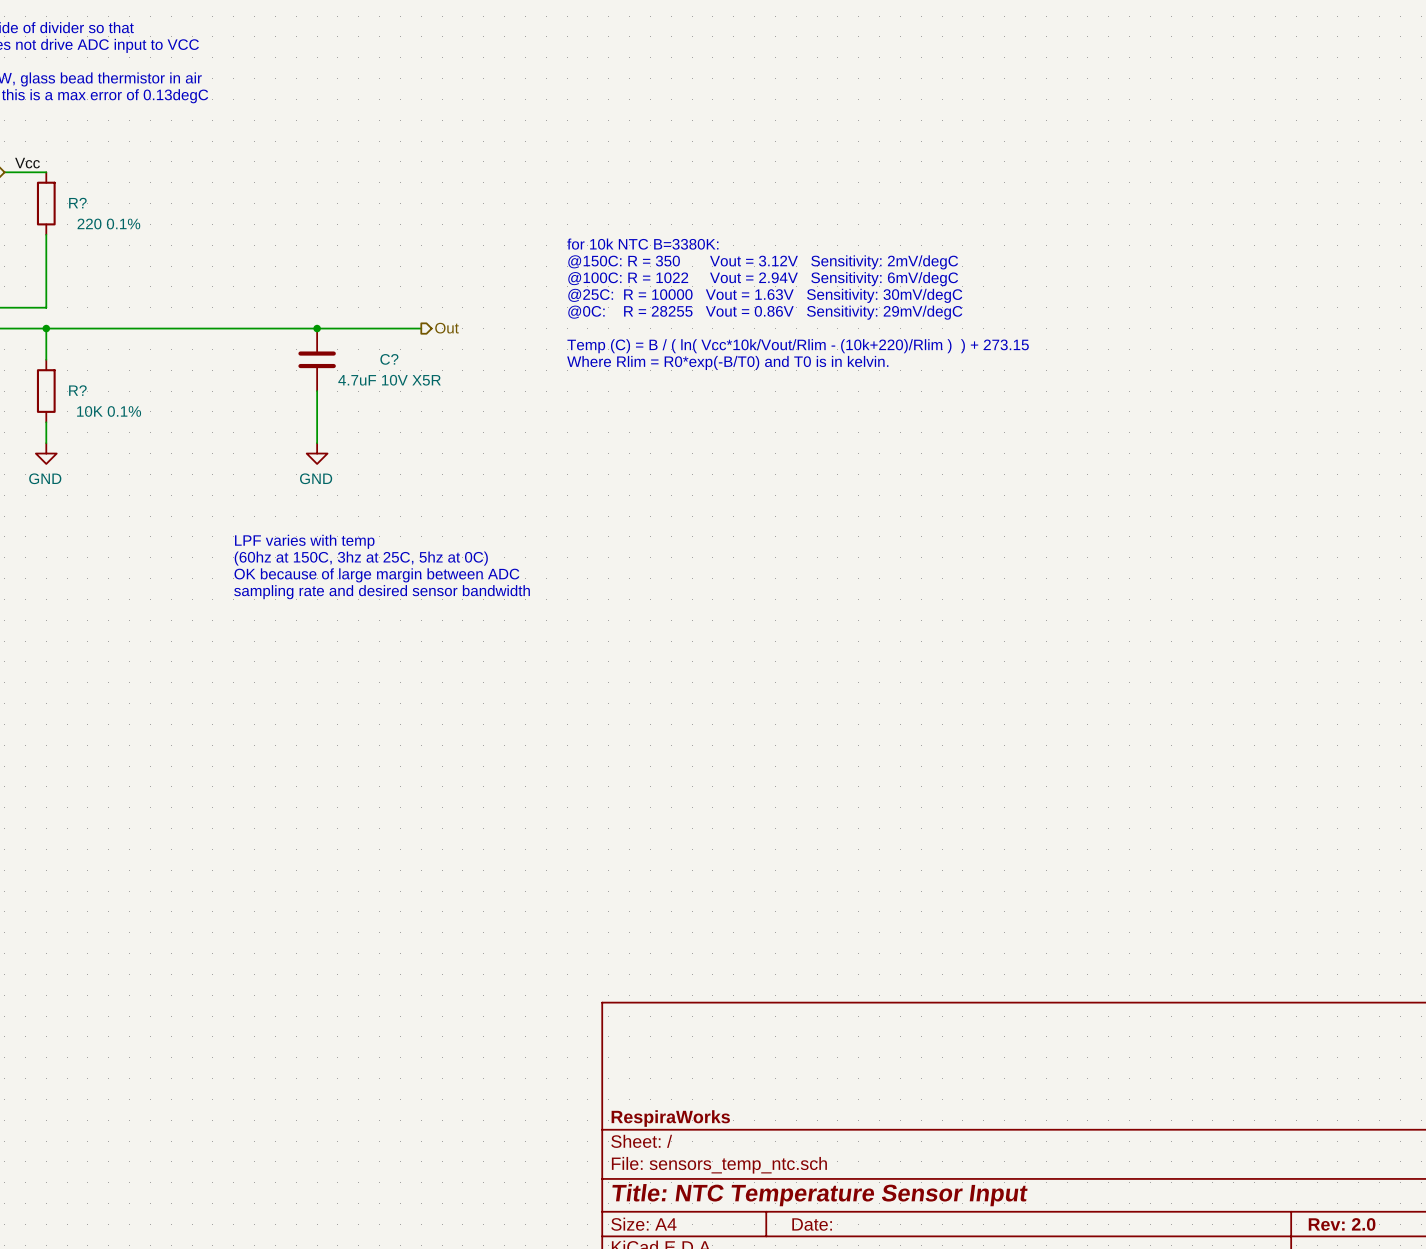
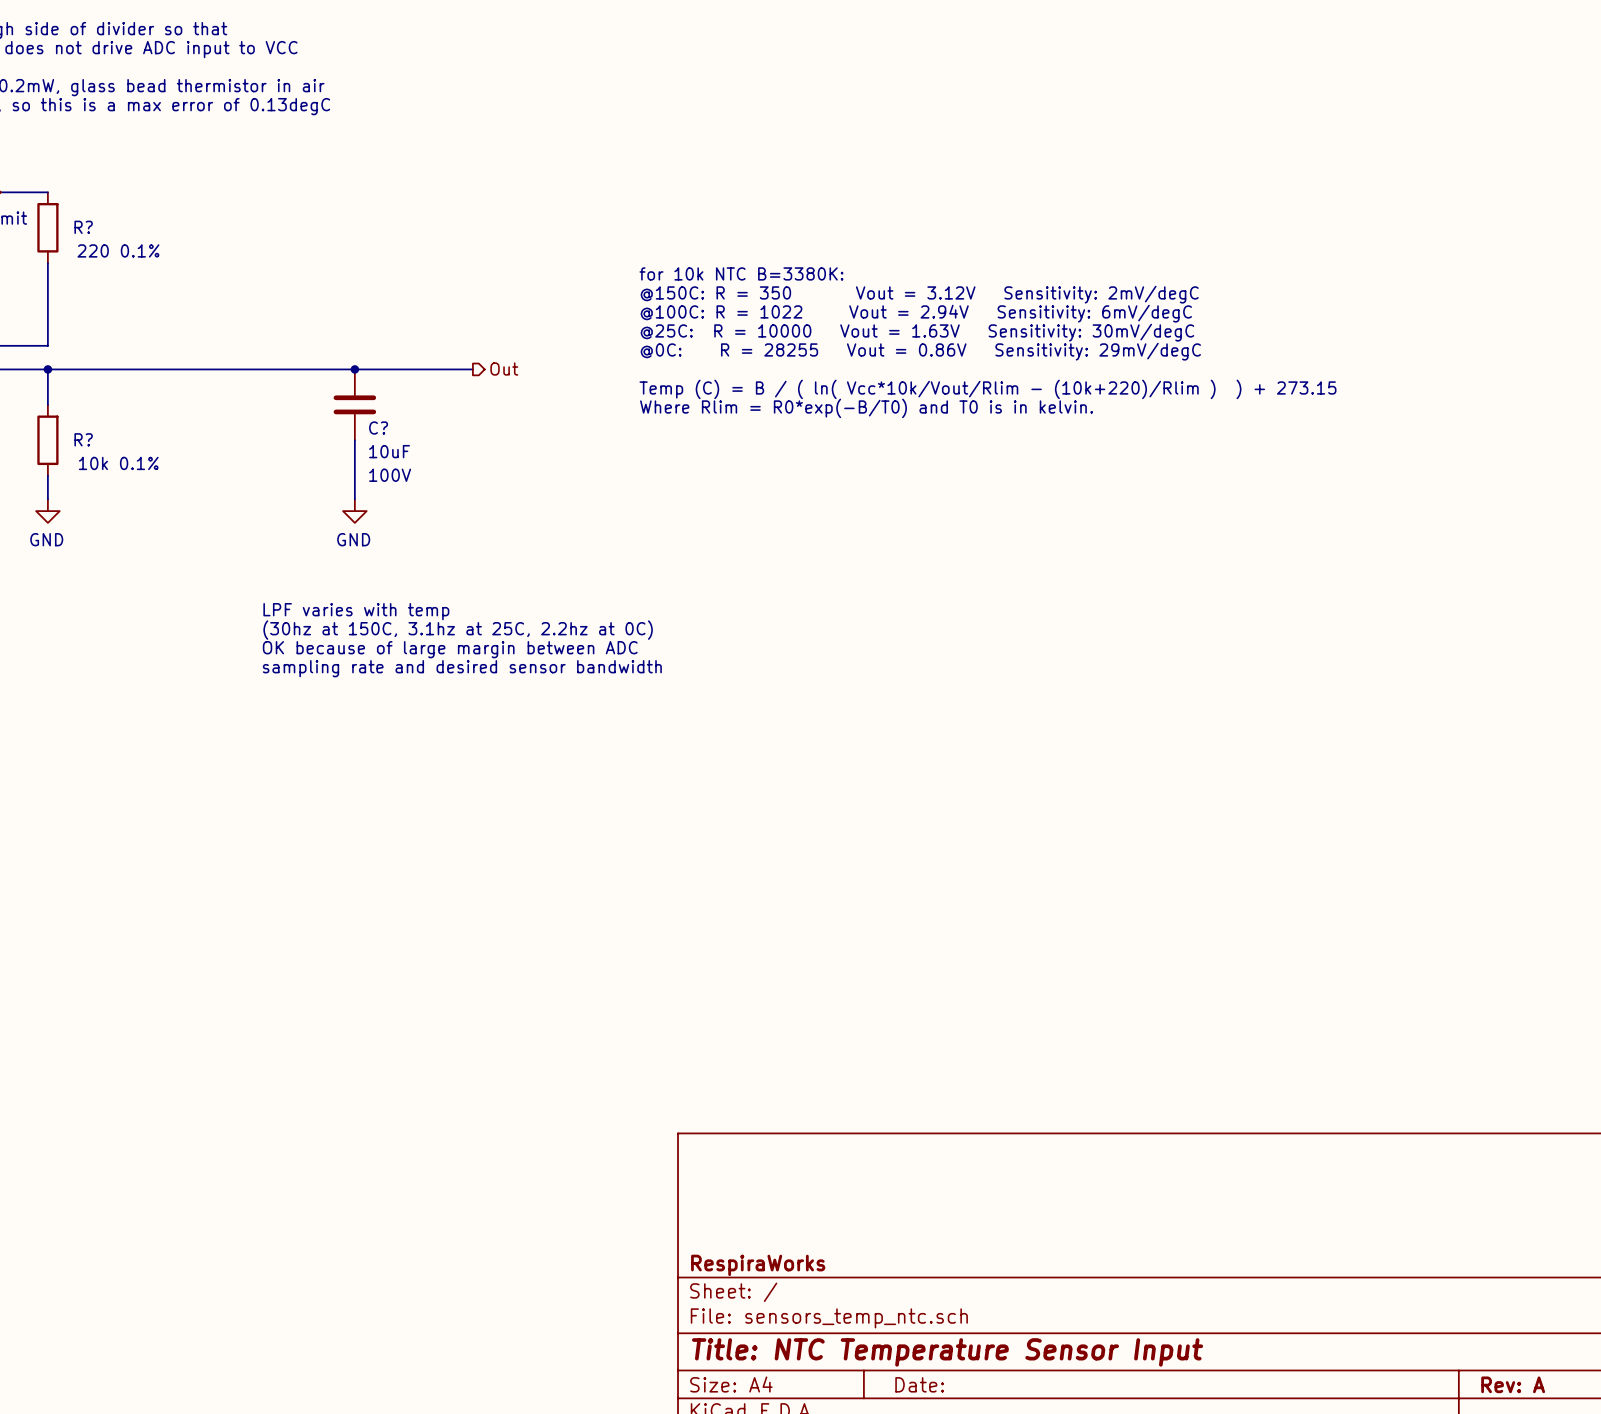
label: Vcc (27, 163) -> none
C? name position: C? (389, 359) -> C? (378, 428)
C? value: 4.7uF 10V X5R (389, 380) -> 10uF (389, 451)
R? value: 10K 0.1% (109, 411) -> 10k 0.1% (118, 463)
C? text: none -> 100V (390, 475)
text: (60hz at 150C, 3hz at 25C, 5hz at 0C) (361, 558) -> (30hz at 150C, 3.1hz at 25C, 2.2hz at 0C) (458, 630)
title block: Rev: 2.0 (1342, 1224) -> Rev: A (1513, 1384)

